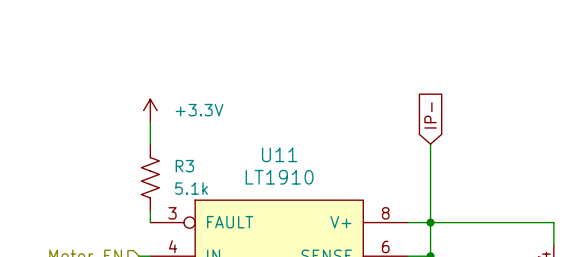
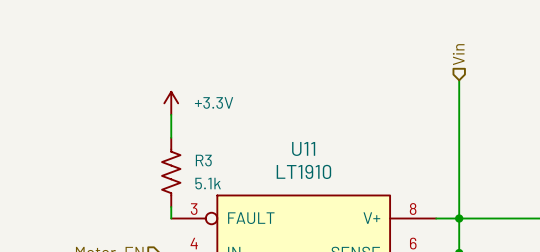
hierarchical label: none -> Vin (458, 54)
wire: none -> (459, 80) (459, 137)
global label: IP- (430, 115) -> none

